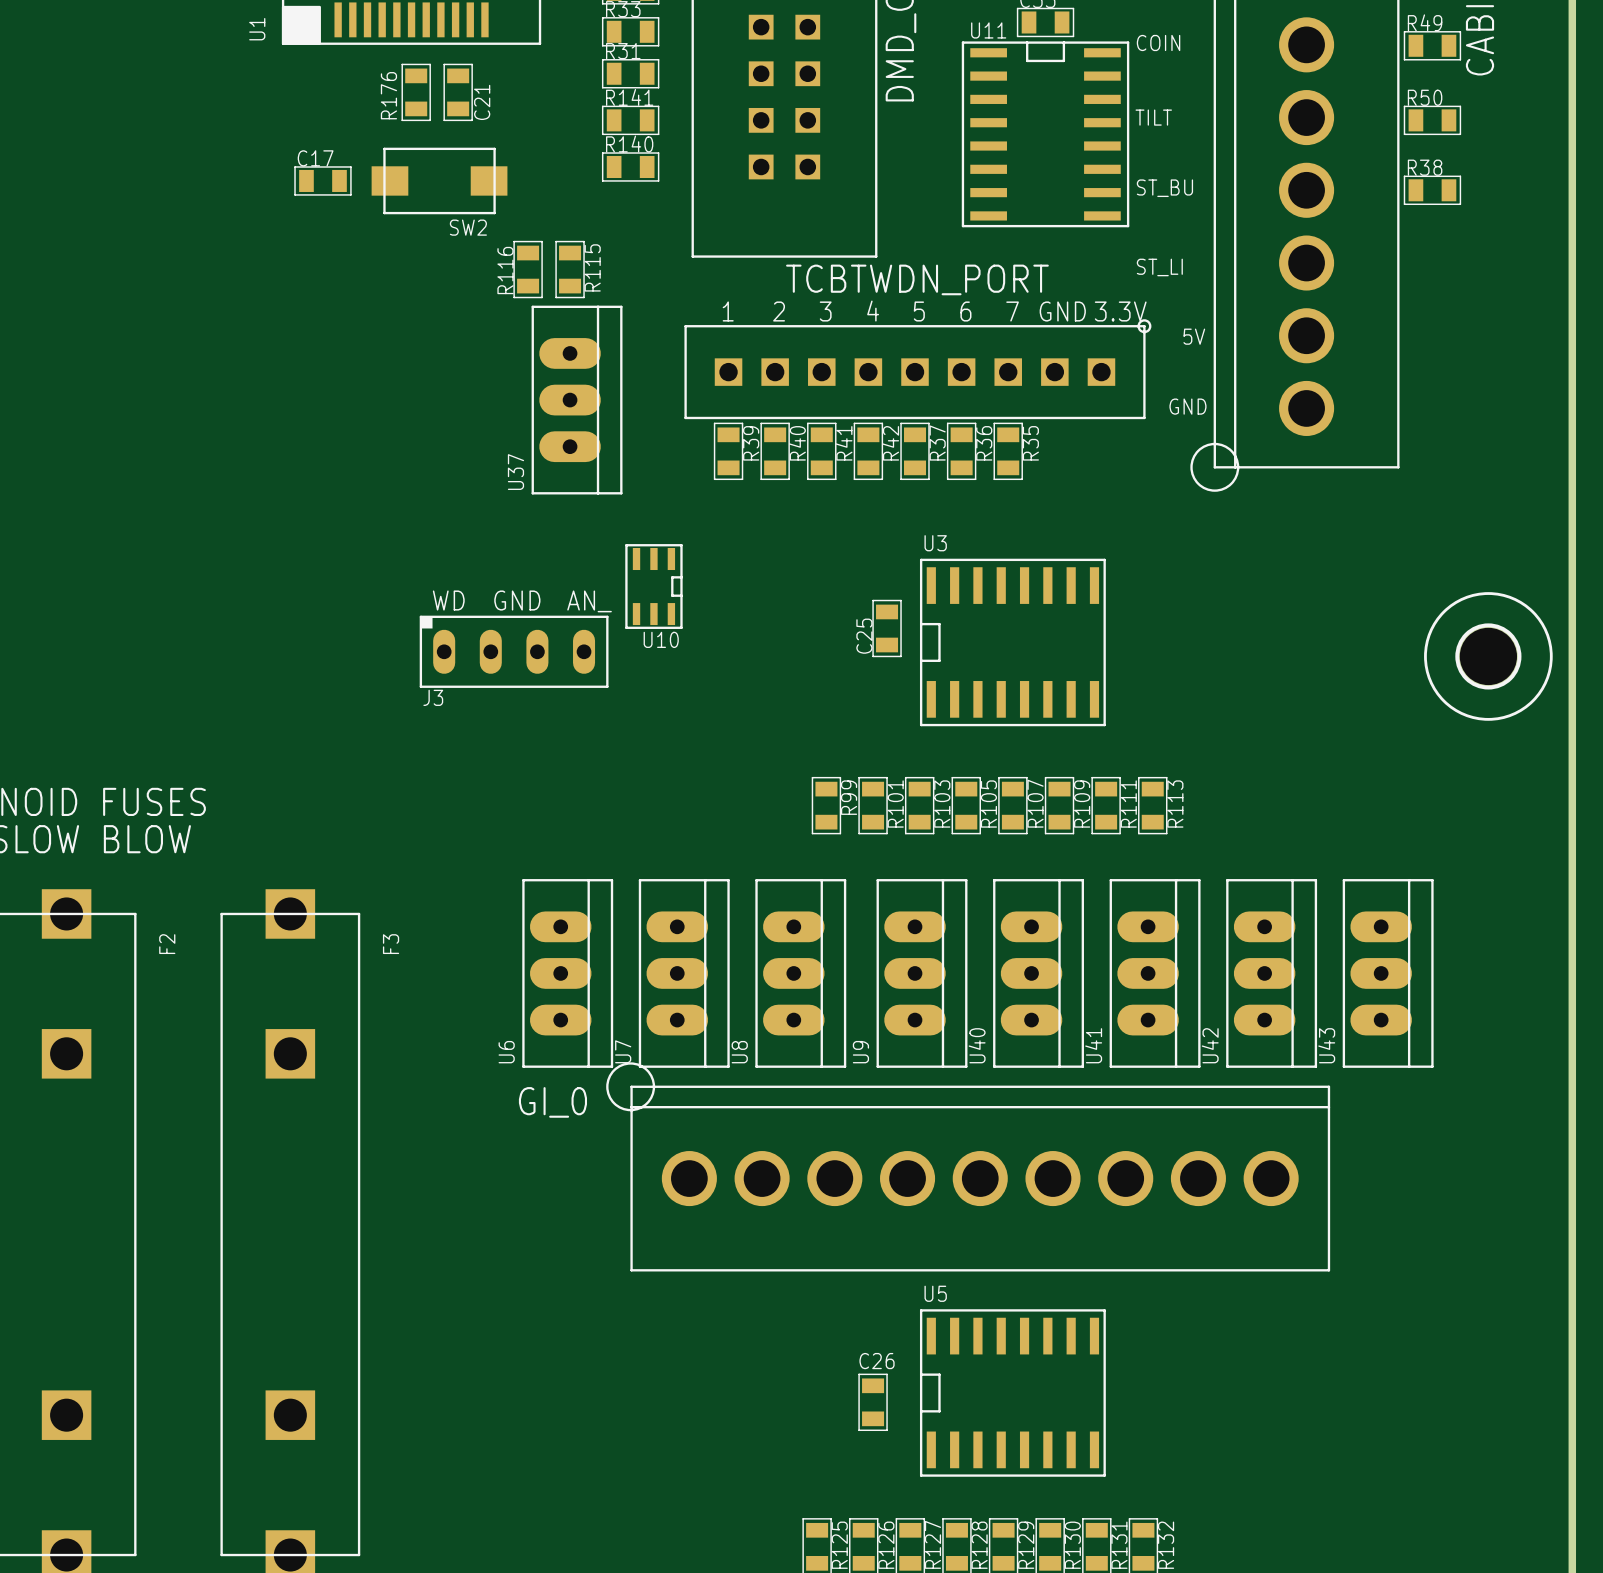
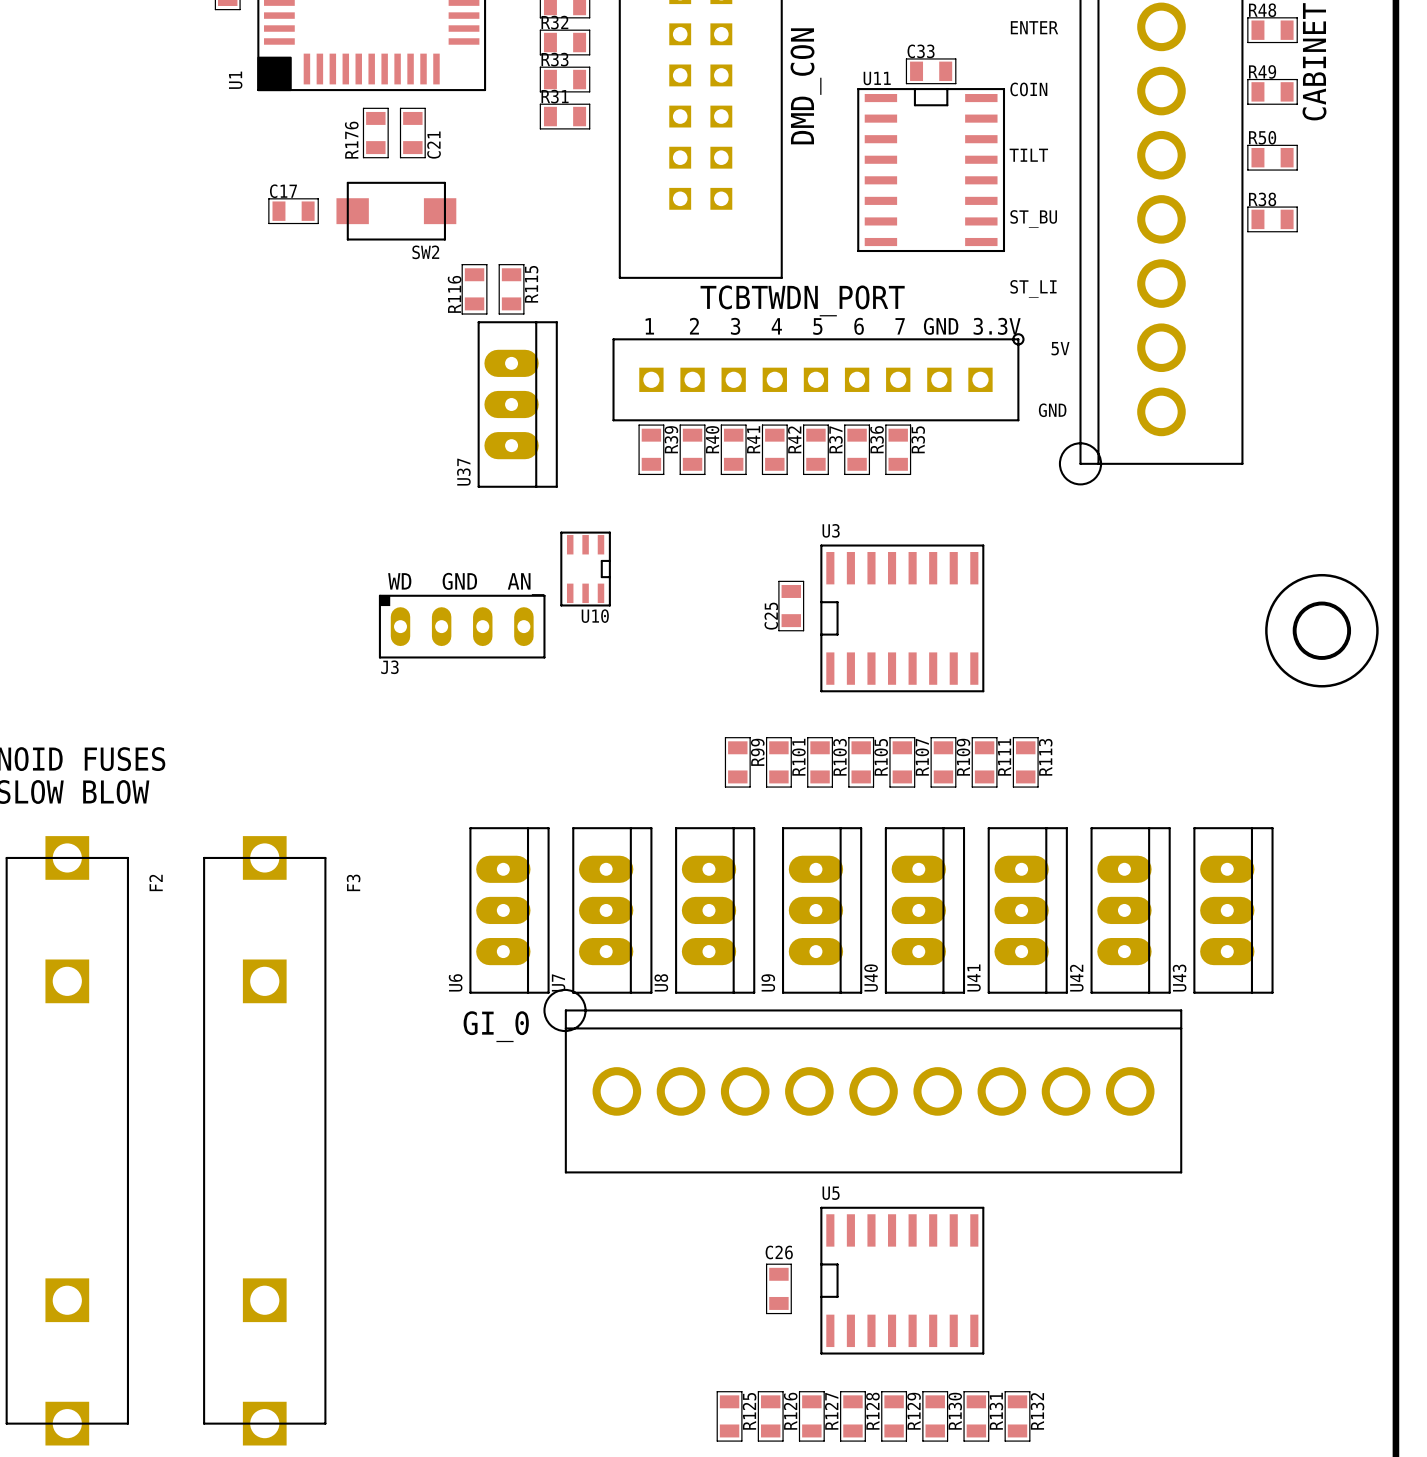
R141: (630, 120) -> none
R140: (630, 166) -> none

